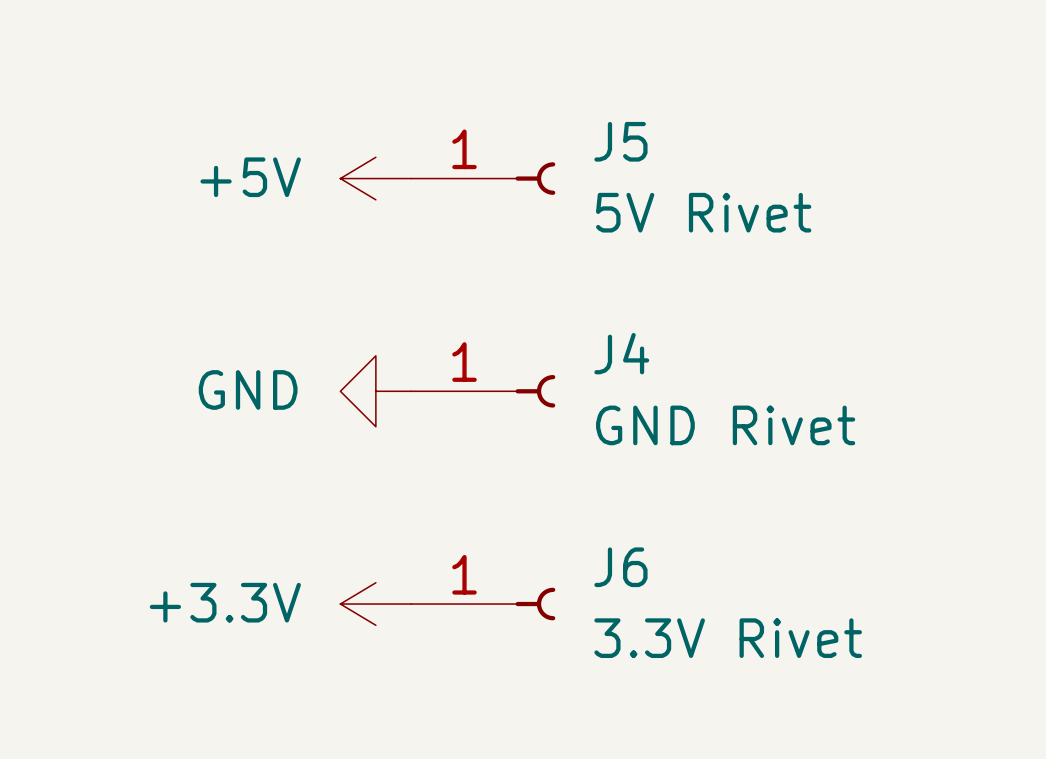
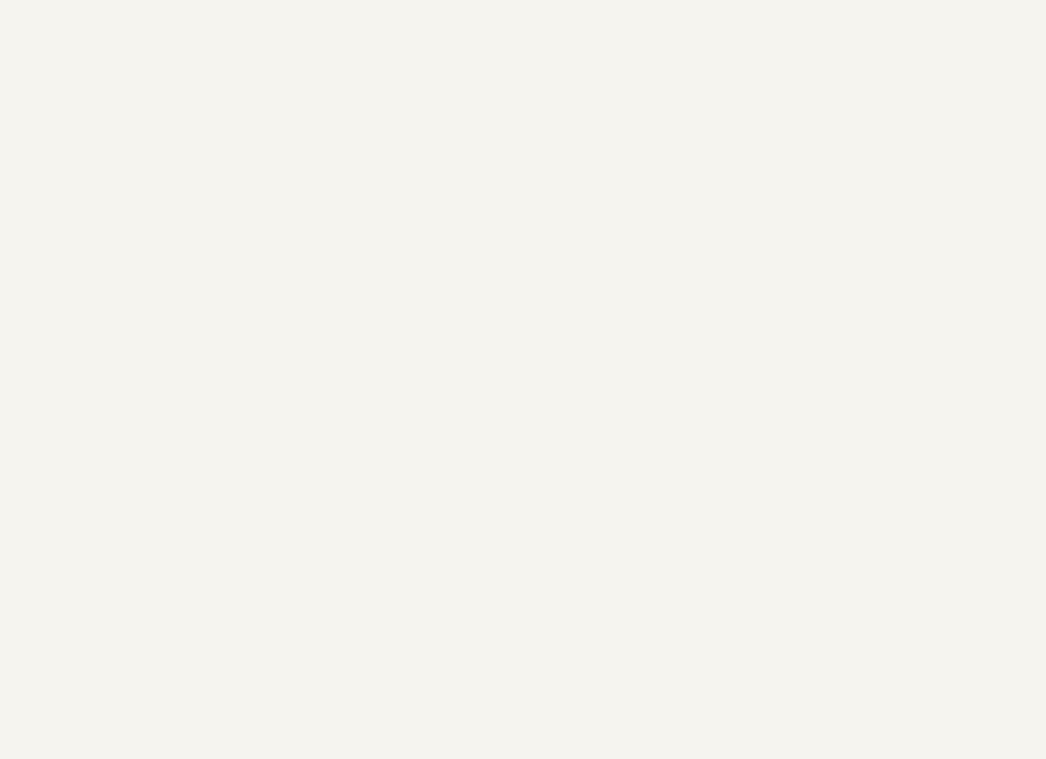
power symbol: +5V (375, 178) -> none
J5: 5V Rivet (483, 178) -> none
power symbol: GND (375, 391) -> none
J4: GND Rivet (483, 391) -> none
power symbol: +3.3V (375, 604) -> none
J6: 3.3V Rivet (483, 604) -> none

